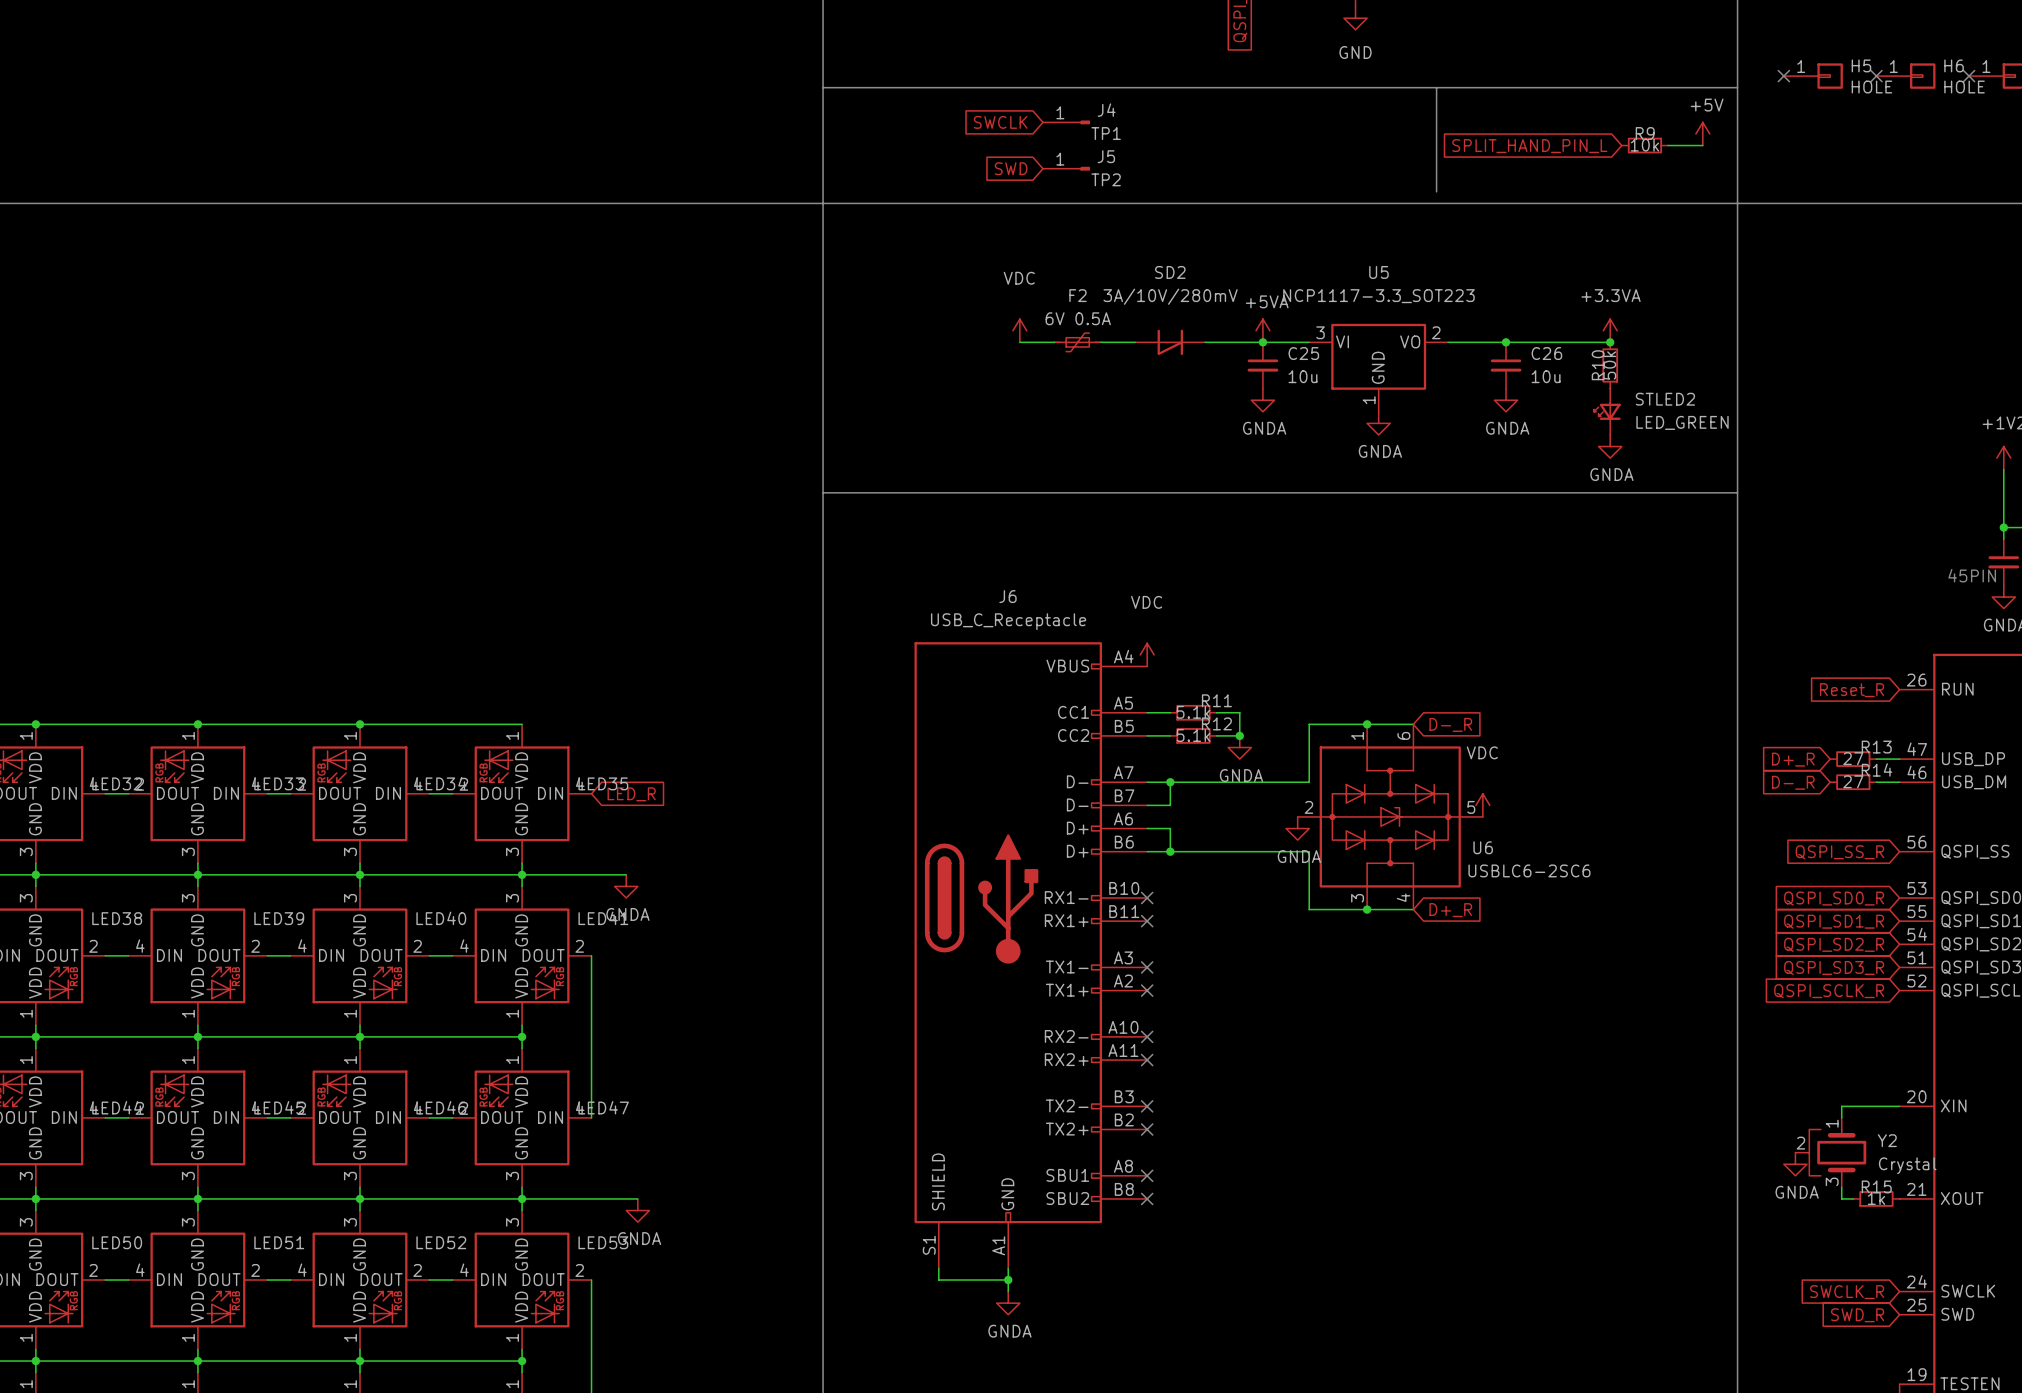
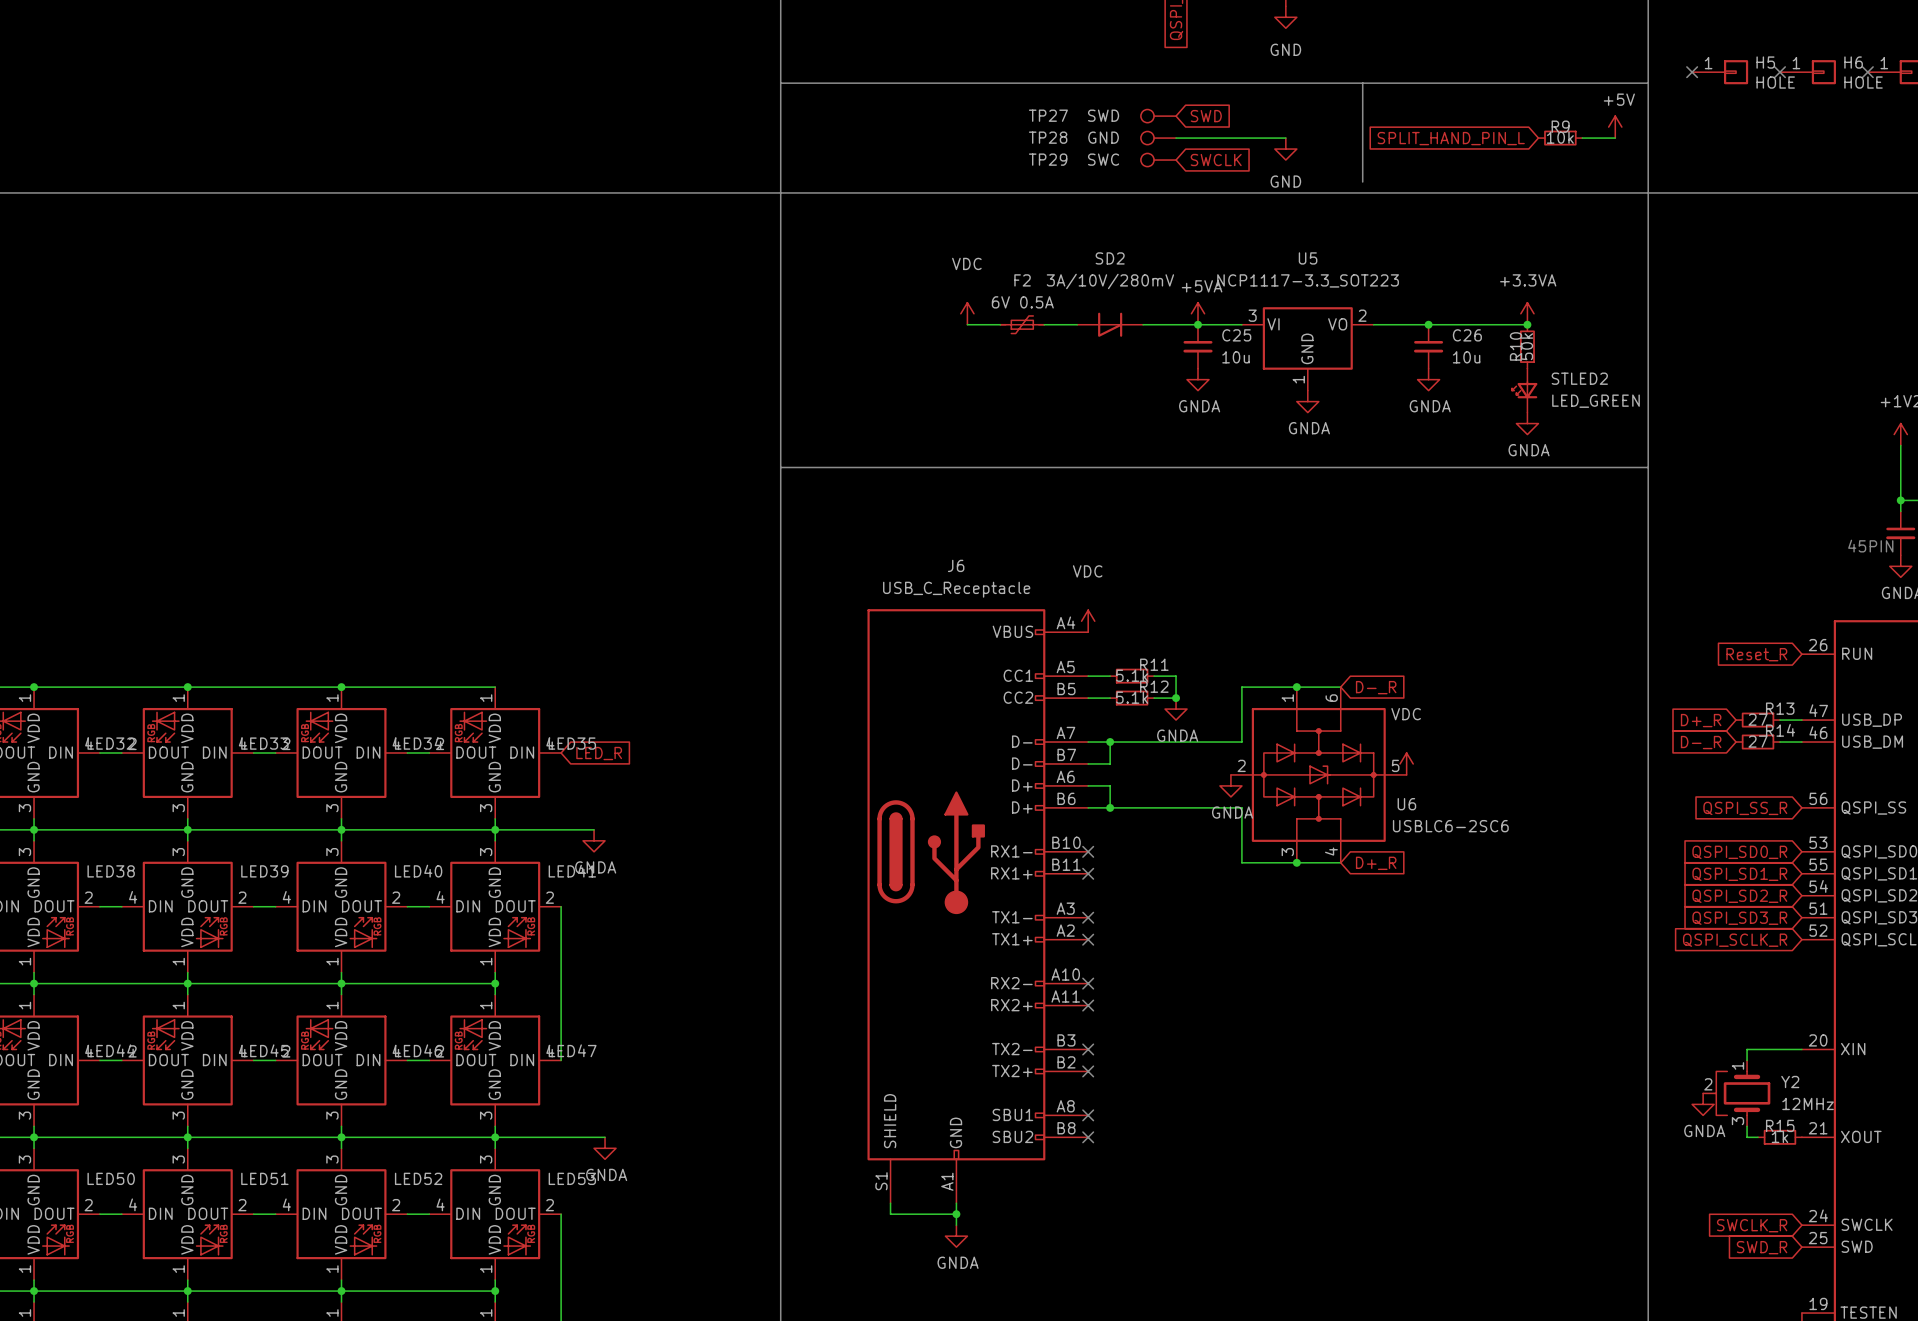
global label rotation: 0° (1000, 122) -> 180° (1216, 160)
global label position: SWCLK (1000, 122) -> SWCLK (1216, 160)
J4: TP1 (1066, 122) -> none
TP27: none -> SWD (1158, 116)
TP28: none -> GND (1158, 138)
wire: none -> (1176, 138) (1285, 138)
power symbol: none -> GND (1285, 149)
global label rotation: 0° (1011, 168) -> 180° (1206, 116)
global label position: SWD (1011, 168) -> SWD (1206, 116)
J5: TP2 (1066, 168) -> none
TP29: none -> SWC (1158, 160)
Y2 value: Crystal (1907, 1165) -> 12MHz (1808, 1103)

